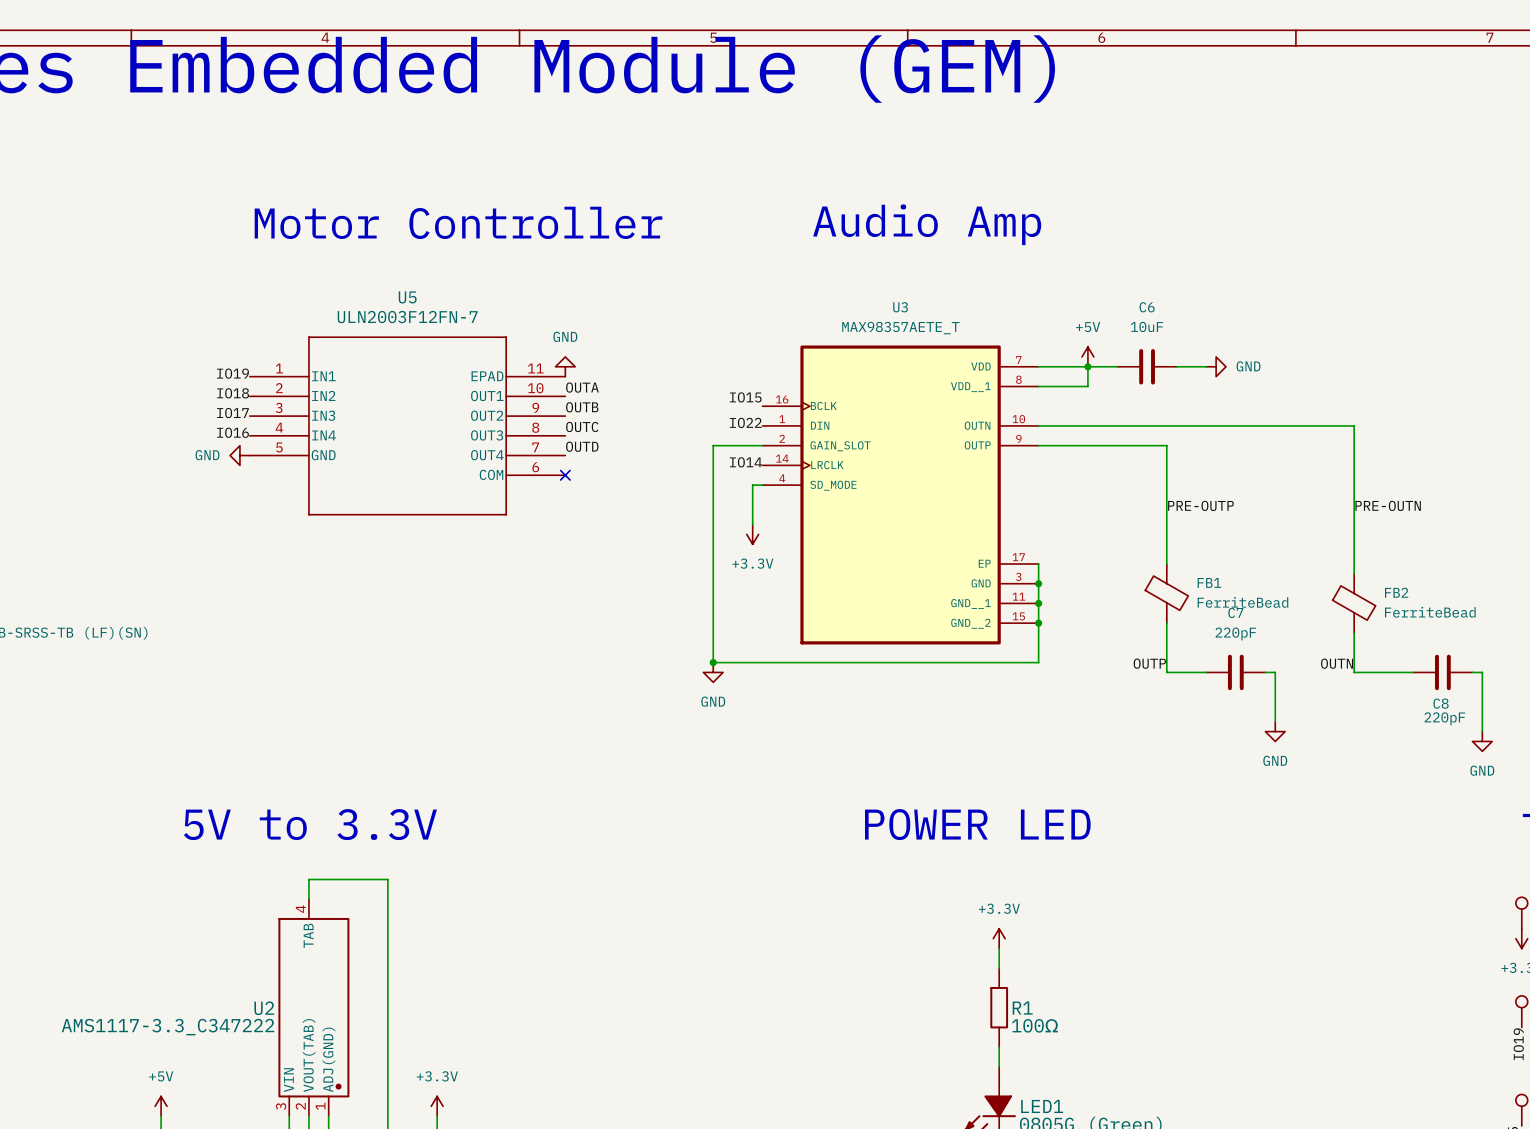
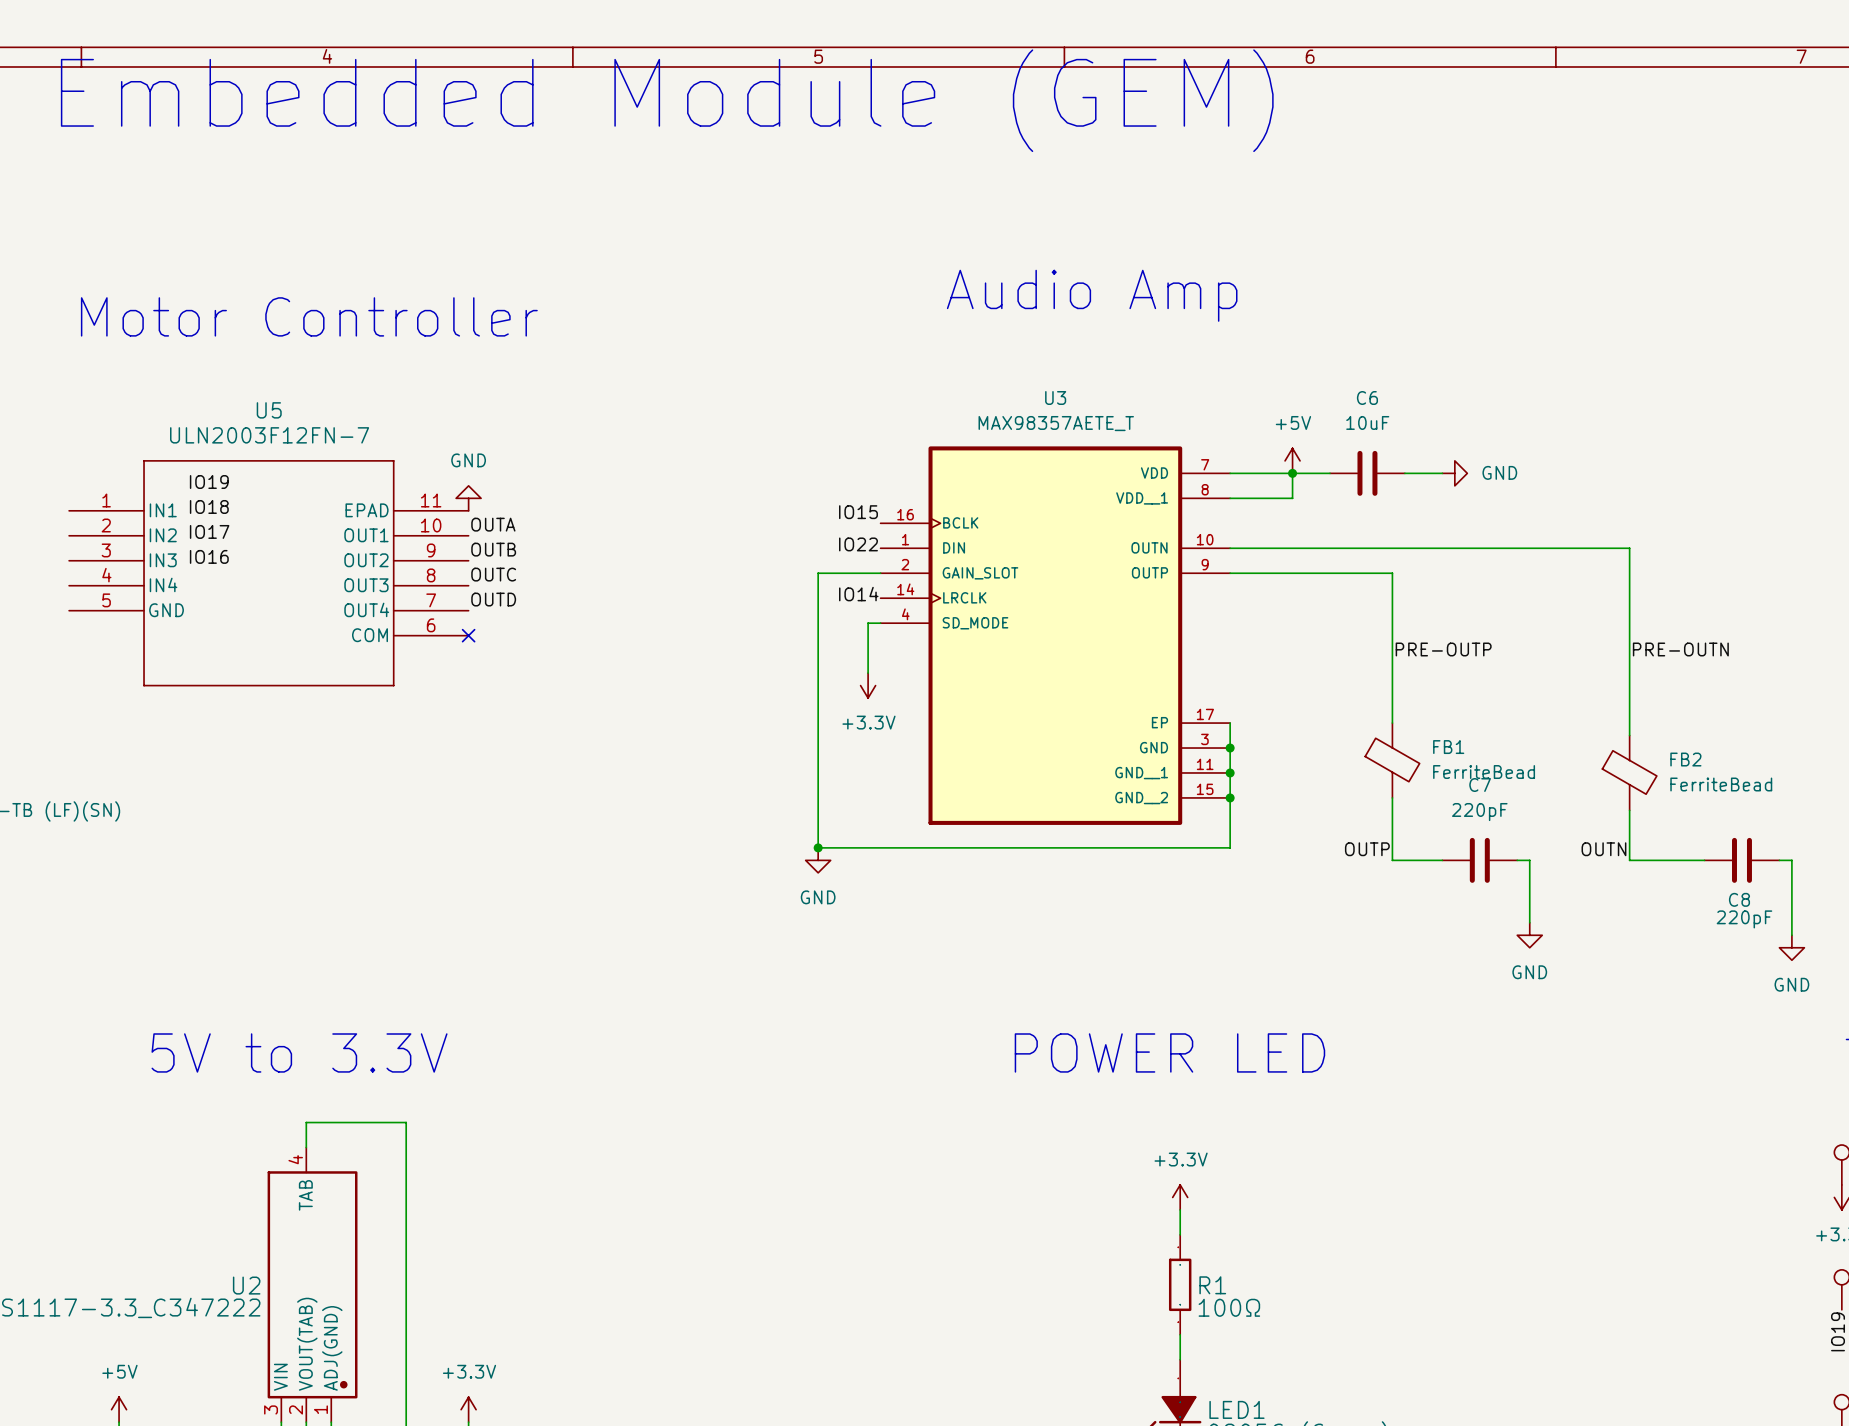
text position: Motor Controller (458, 222) -> Motor Controller (309, 316)
power symbol: GND (565, 366) -> none
power symbol: none -> GND (468, 498)
label position: OUTA (582, 387) -> OUTA (493, 524)
label position: OUTB (582, 407) -> OUTB (493, 549)
U5 position: (407, 425) -> (268, 573)
label position: OUTC (582, 427) -> OUTC (493, 574)
label position: OUTD (582, 446) -> OUTD (493, 599)
power symbol: GND (239, 455) -> none
no-connect mark: (565, 475) -> none
no-connect mark: none -> (468, 635)

